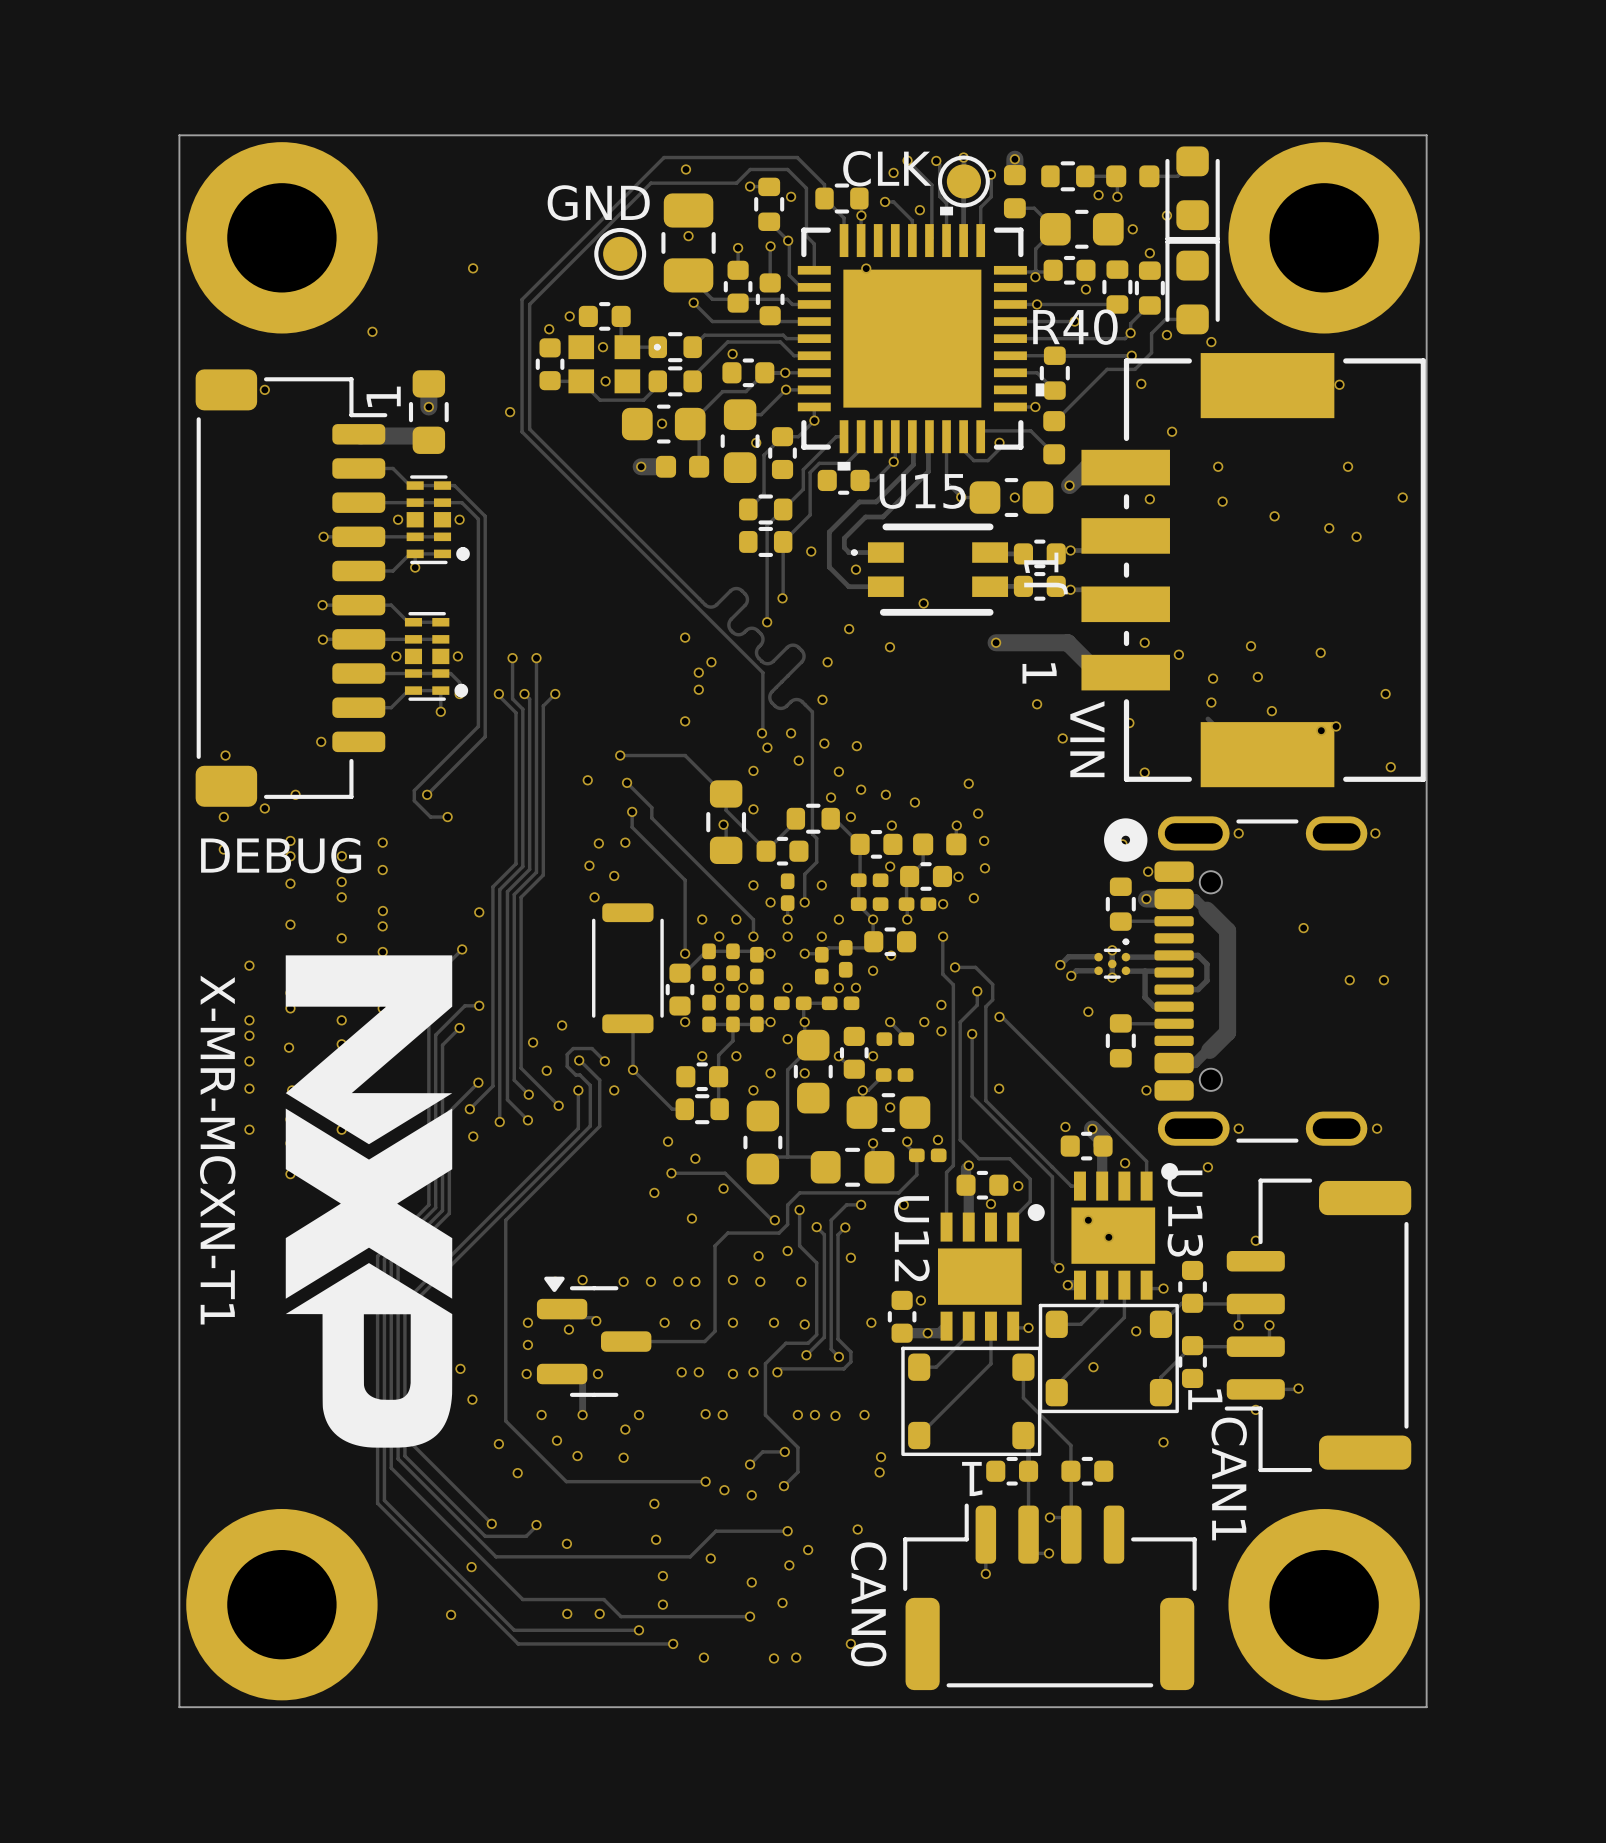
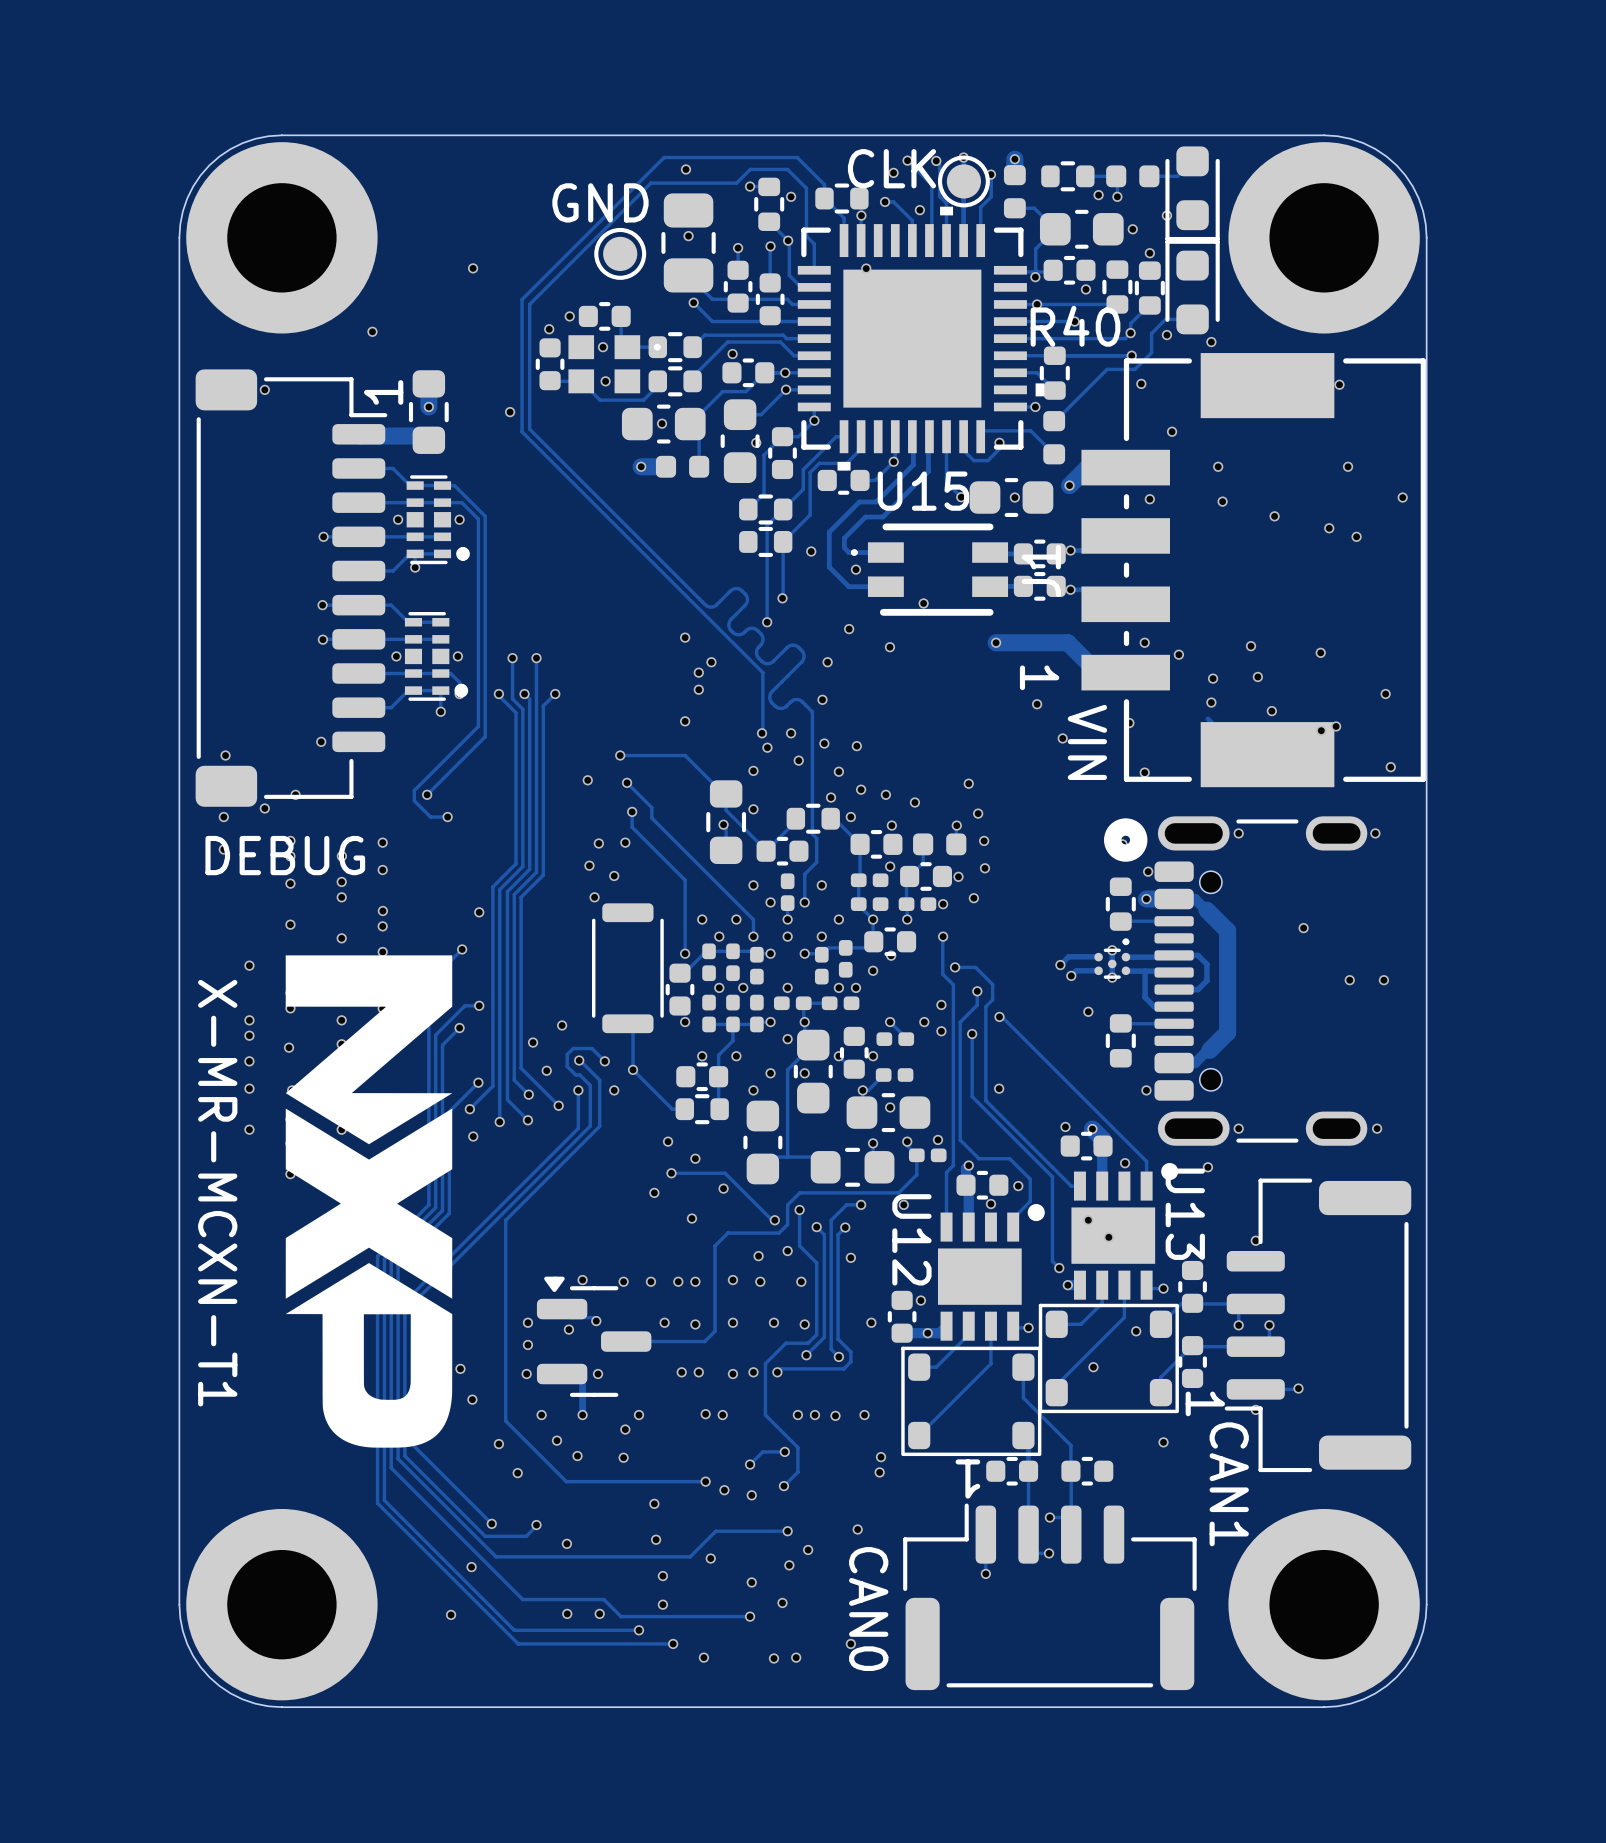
board edge: (281, 135) (179, 135) (179, 237) -> (281, 135) (268, 136) (242, 143) (219, 156) (209, 165) (193, 186) (187, 198) (180, 224) (179, 237)
board edge: (1324, 135) (1426, 135) (1426, 237) -> (1324, 135) (1337, 136) (1363, 143) (1375, 149) (1396, 165) (1405, 175) (1418, 198) (1425, 224) (1426, 237)
board edge: (179, 1604) (179, 1707) (281, 1707) -> (179, 1604) (182, 1631) (187, 1643) (193, 1655) (209, 1677) (219, 1686) (242, 1699) (255, 1703) (281, 1707)
board edge: (1426, 1604) (1426, 1707) (1324, 1707) -> (1426, 1604) (1423, 1631) (1418, 1643) (1412, 1655) (1396, 1677) (1375, 1693) (1363, 1699) (1350, 1703) (1324, 1707)

